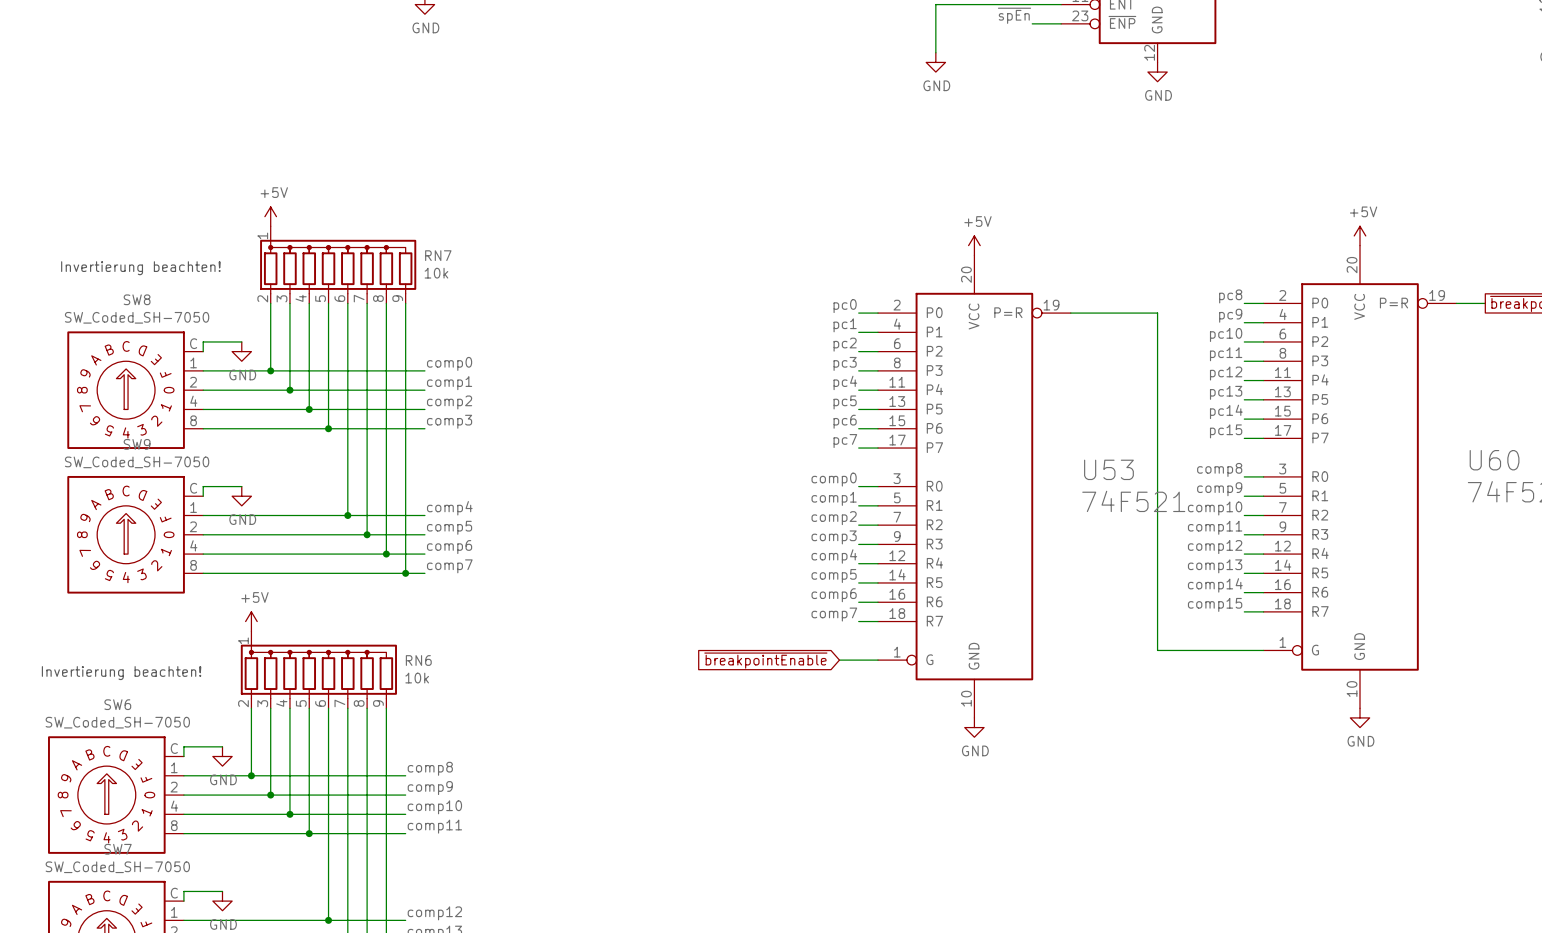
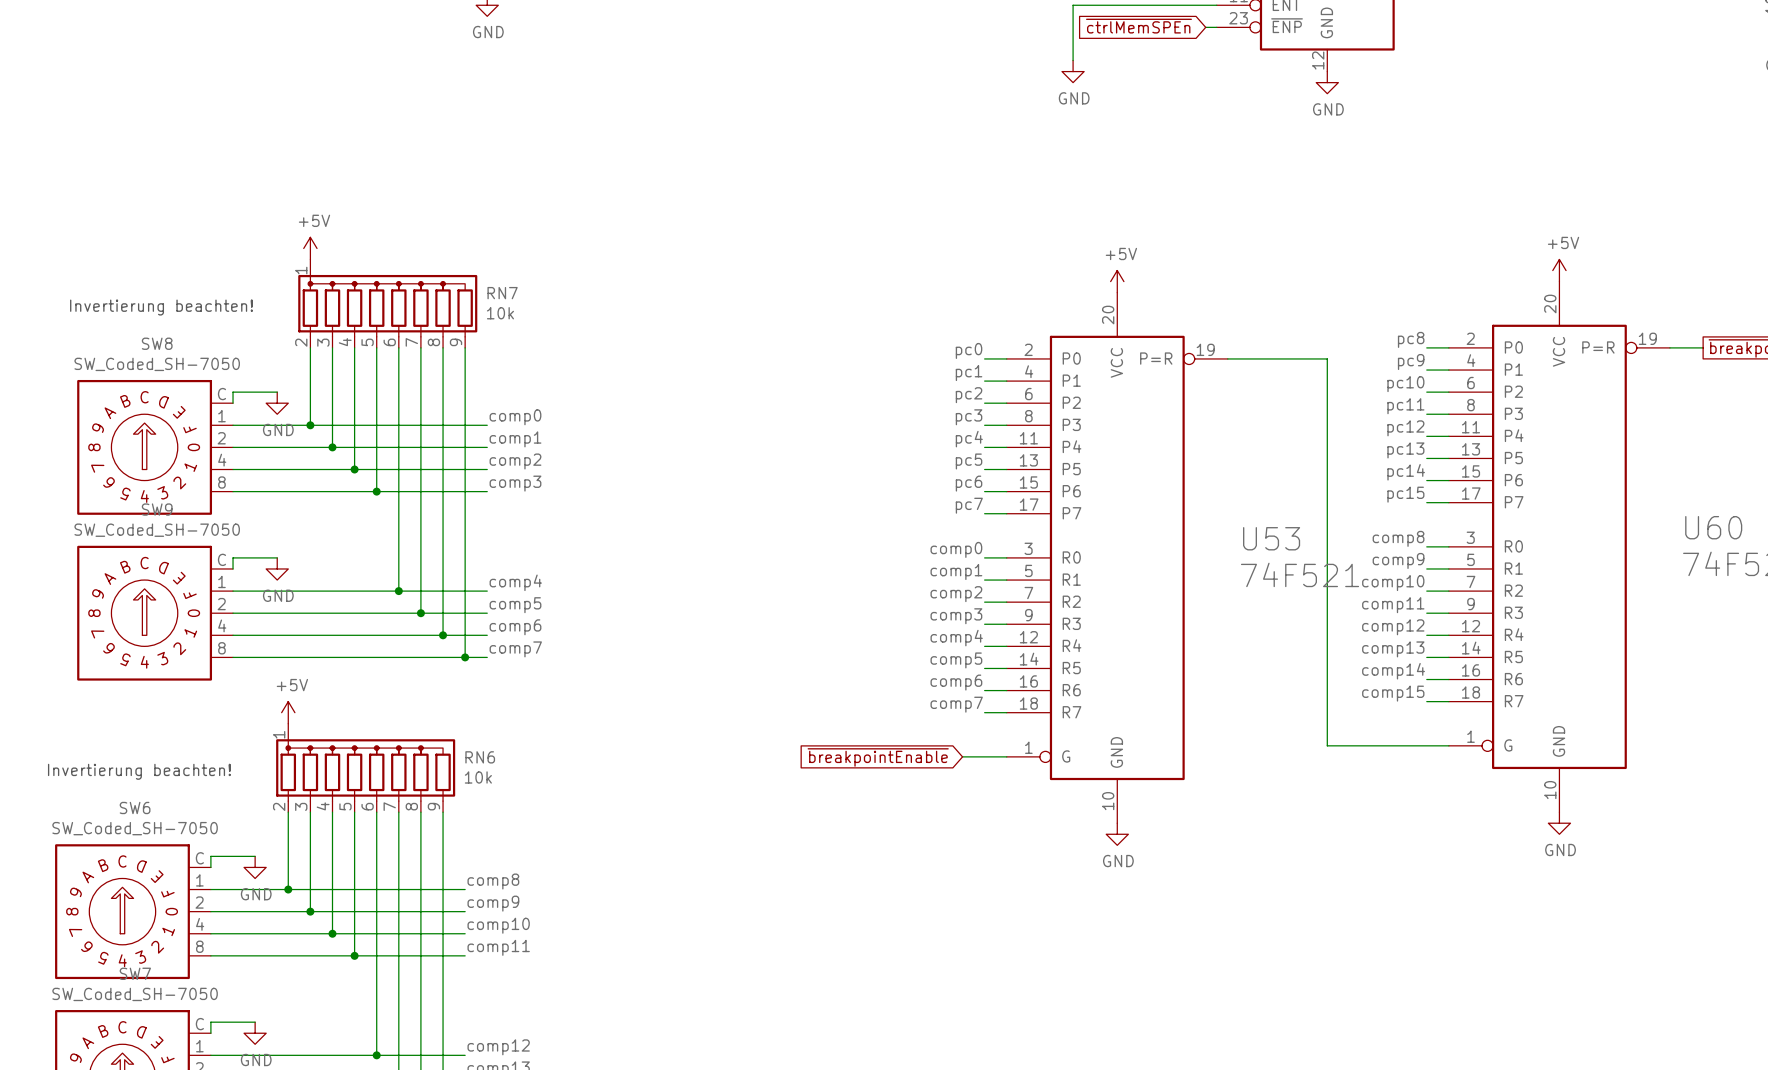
label: ~{spEn} (1014, 15) -> none
global label: none -> ~{ctrlMemSPEn} (1138, 26)
wire: (1032, 23) (1051, 23) -> none

